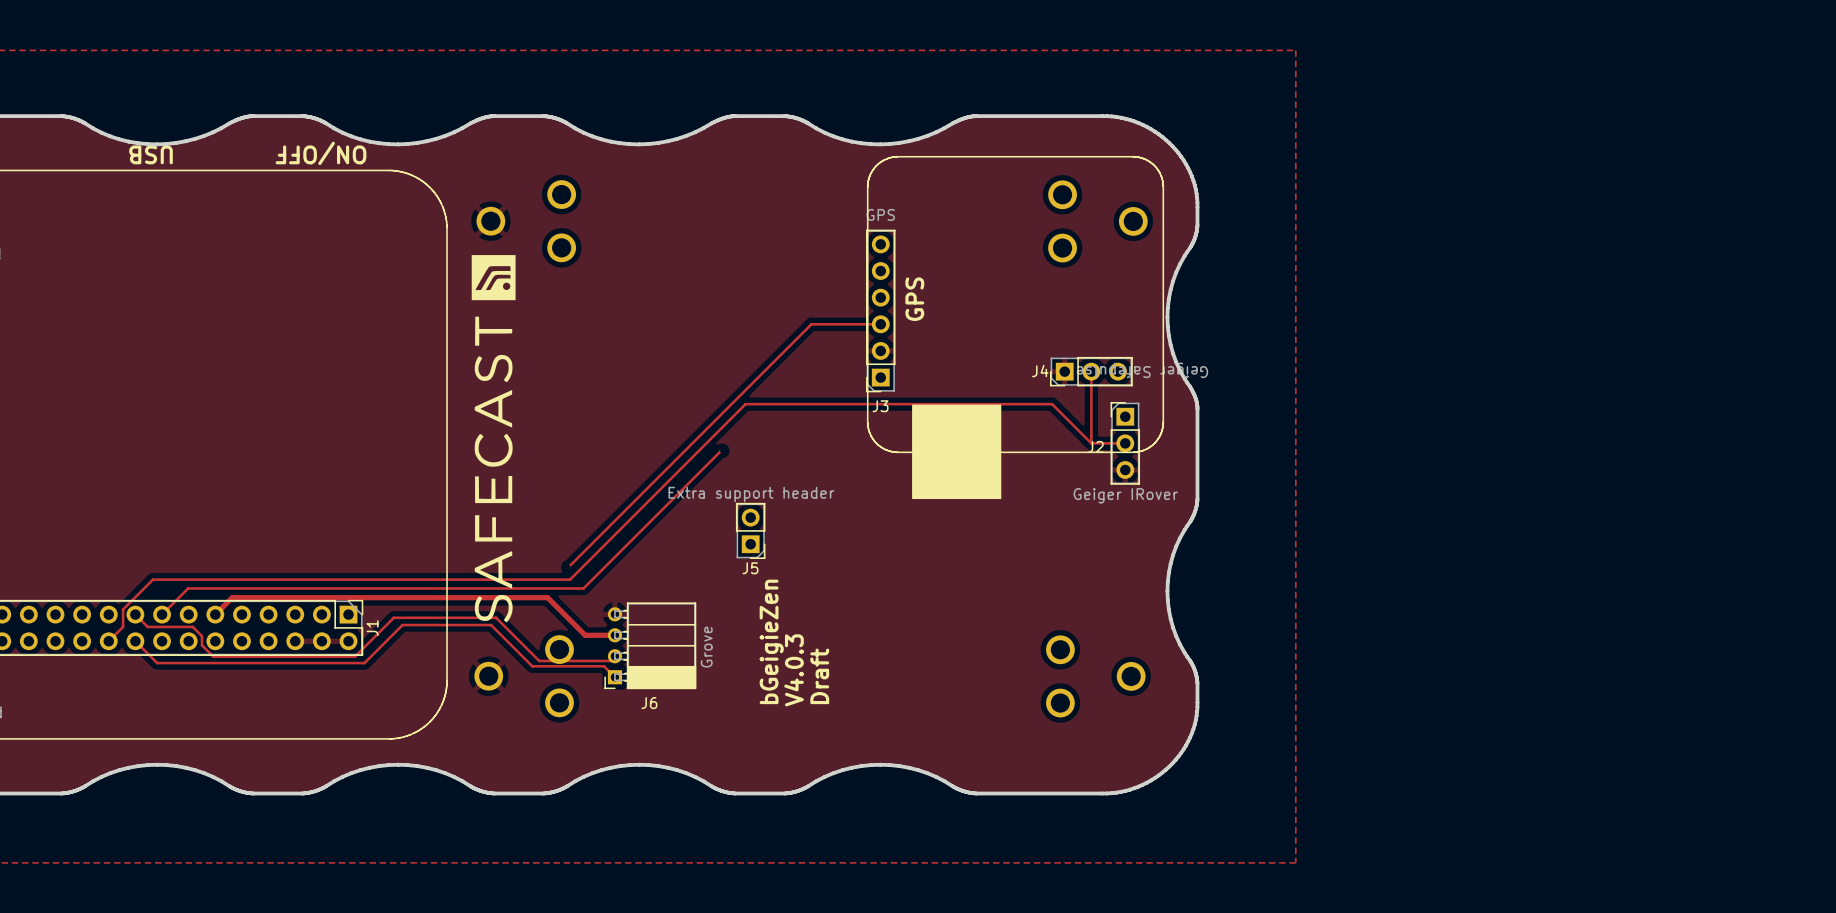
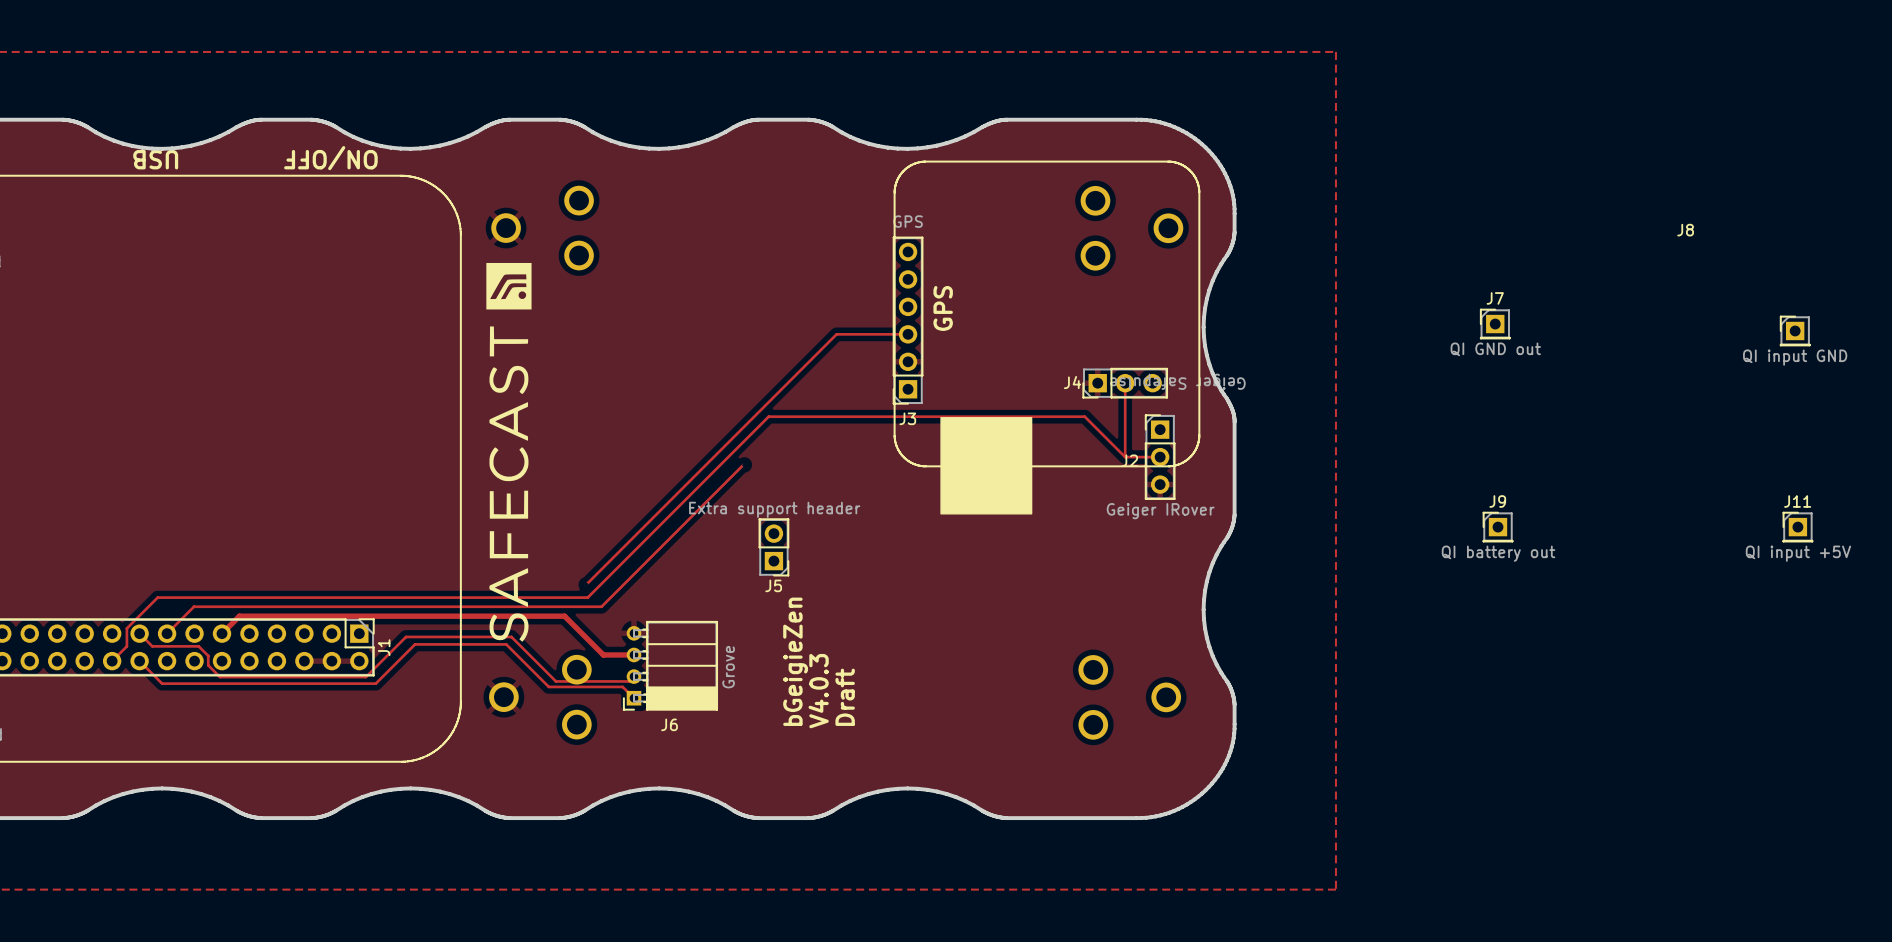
J7: none -> QI GND out (1495, 324)
J8: none -> QI input GND (1795, 330)
J9: none -> QI battery out (1498, 527)
J11: none -> QI input +5V (1797, 527)

